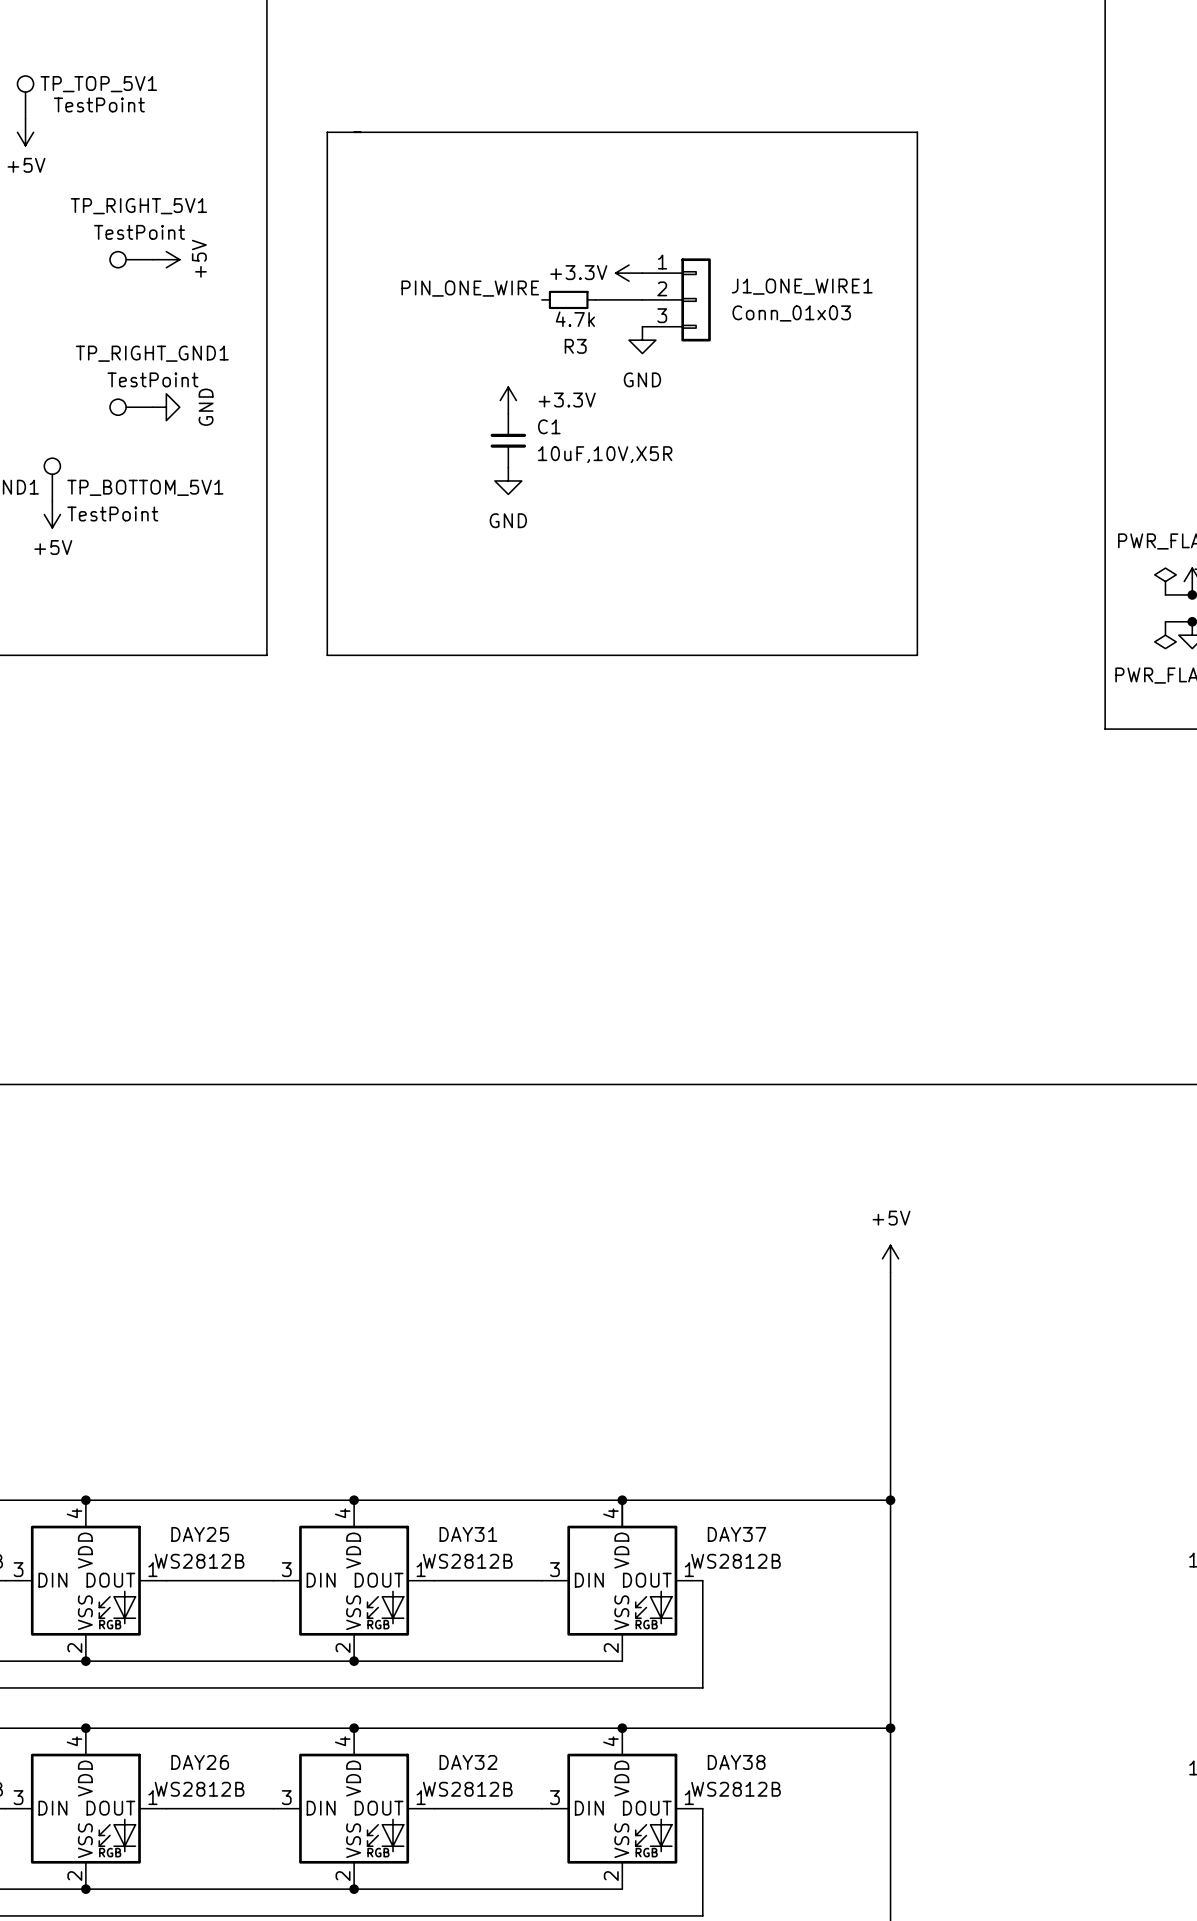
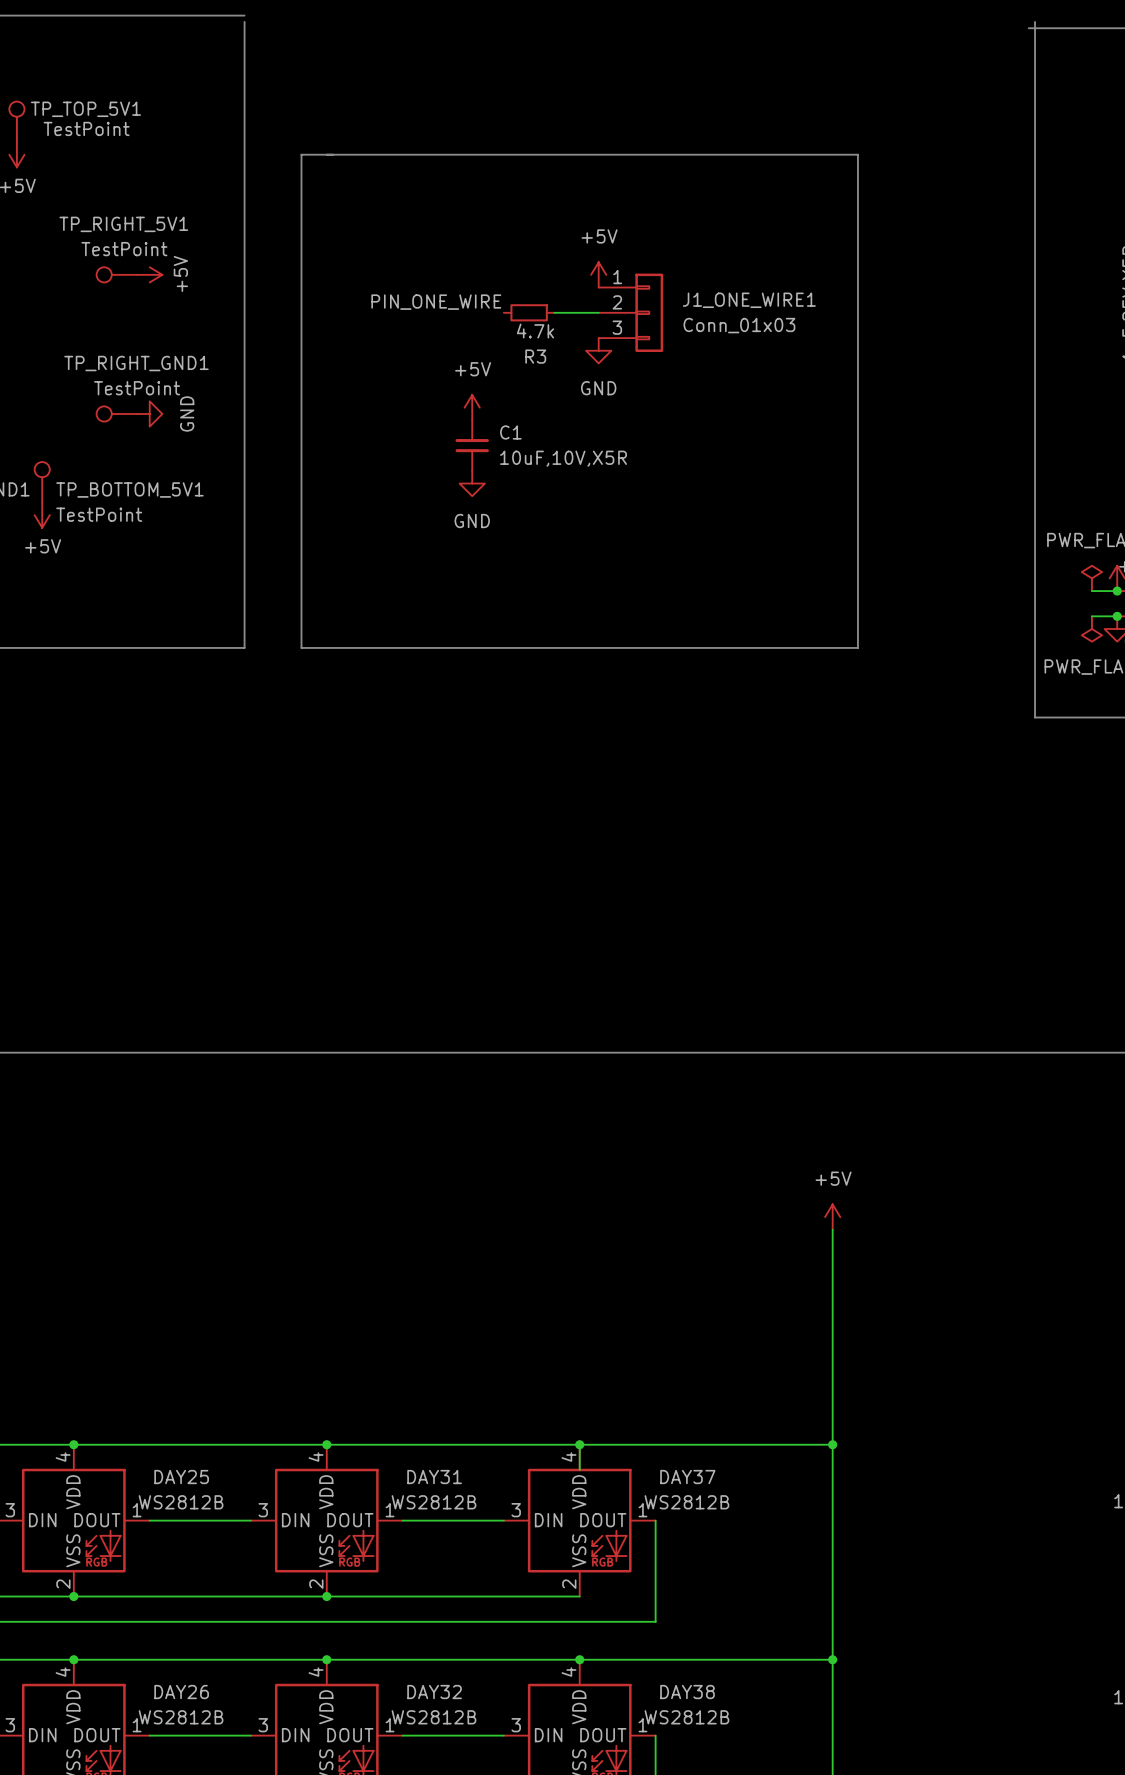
power symbol: none -> +5V (598, 274)
power symbol: +3.3V (629, 273) -> none
power symbol: +3.3V (508, 400) -> +5V (472, 407)

